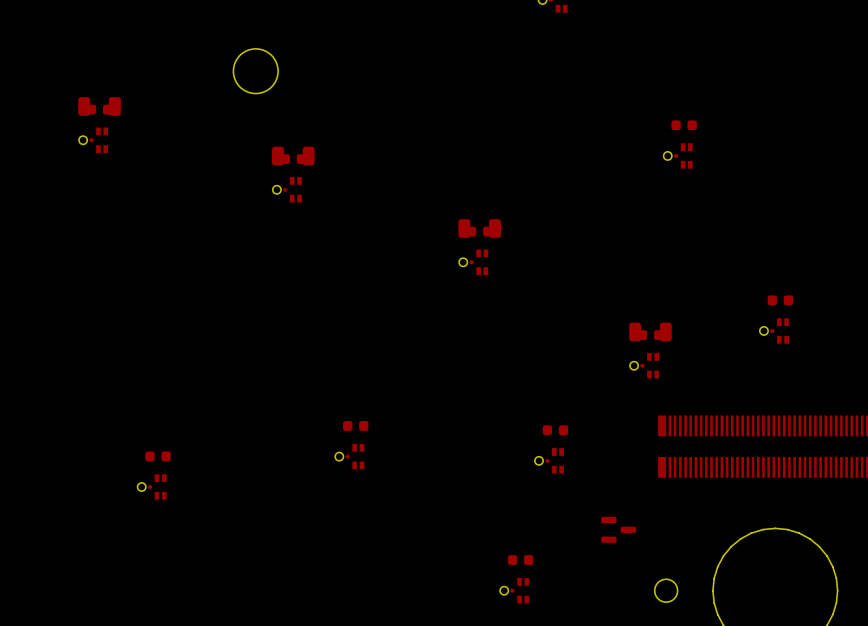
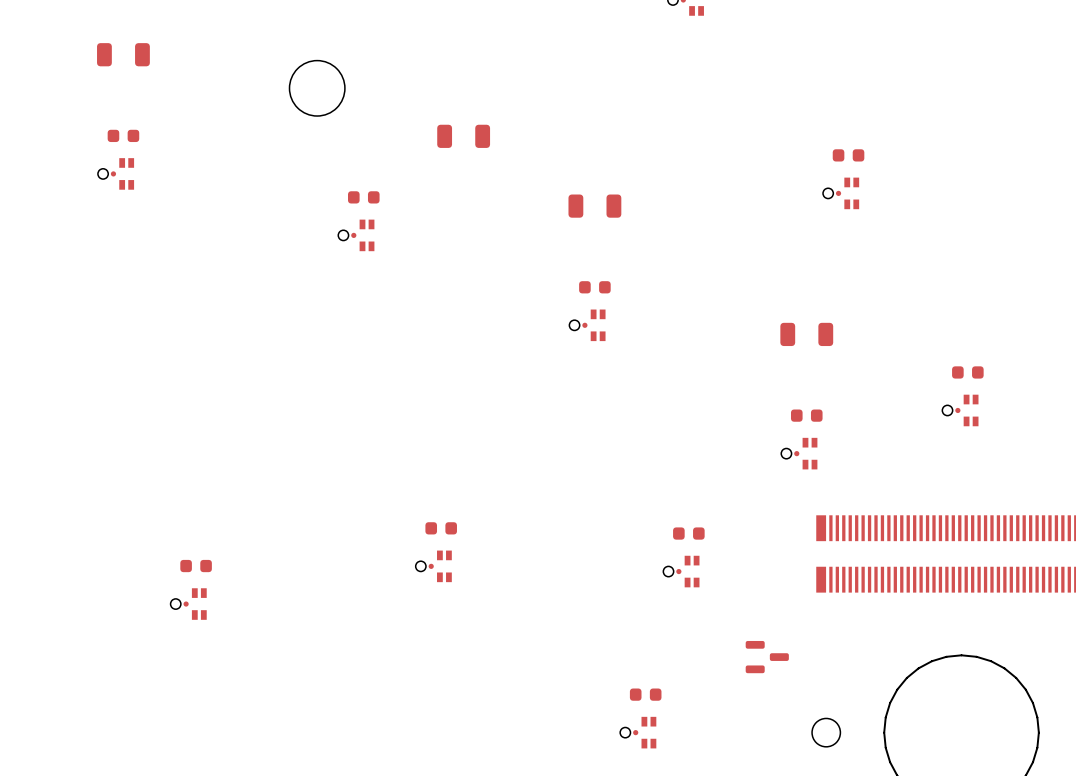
part position: (99, 106) -> (123, 54)
part: none -> (463, 136)
part: (293, 156) -> none
part position: (479, 228) -> (594, 206)
part position: (650, 331) -> (806, 334)

